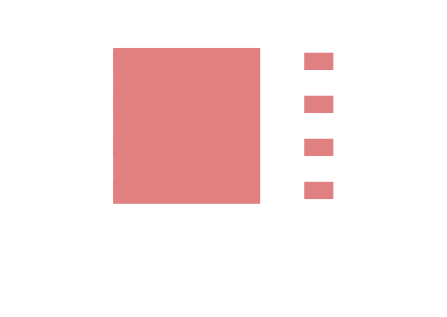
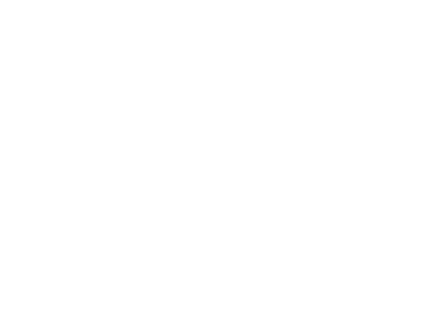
part: (223, 125) -> none

